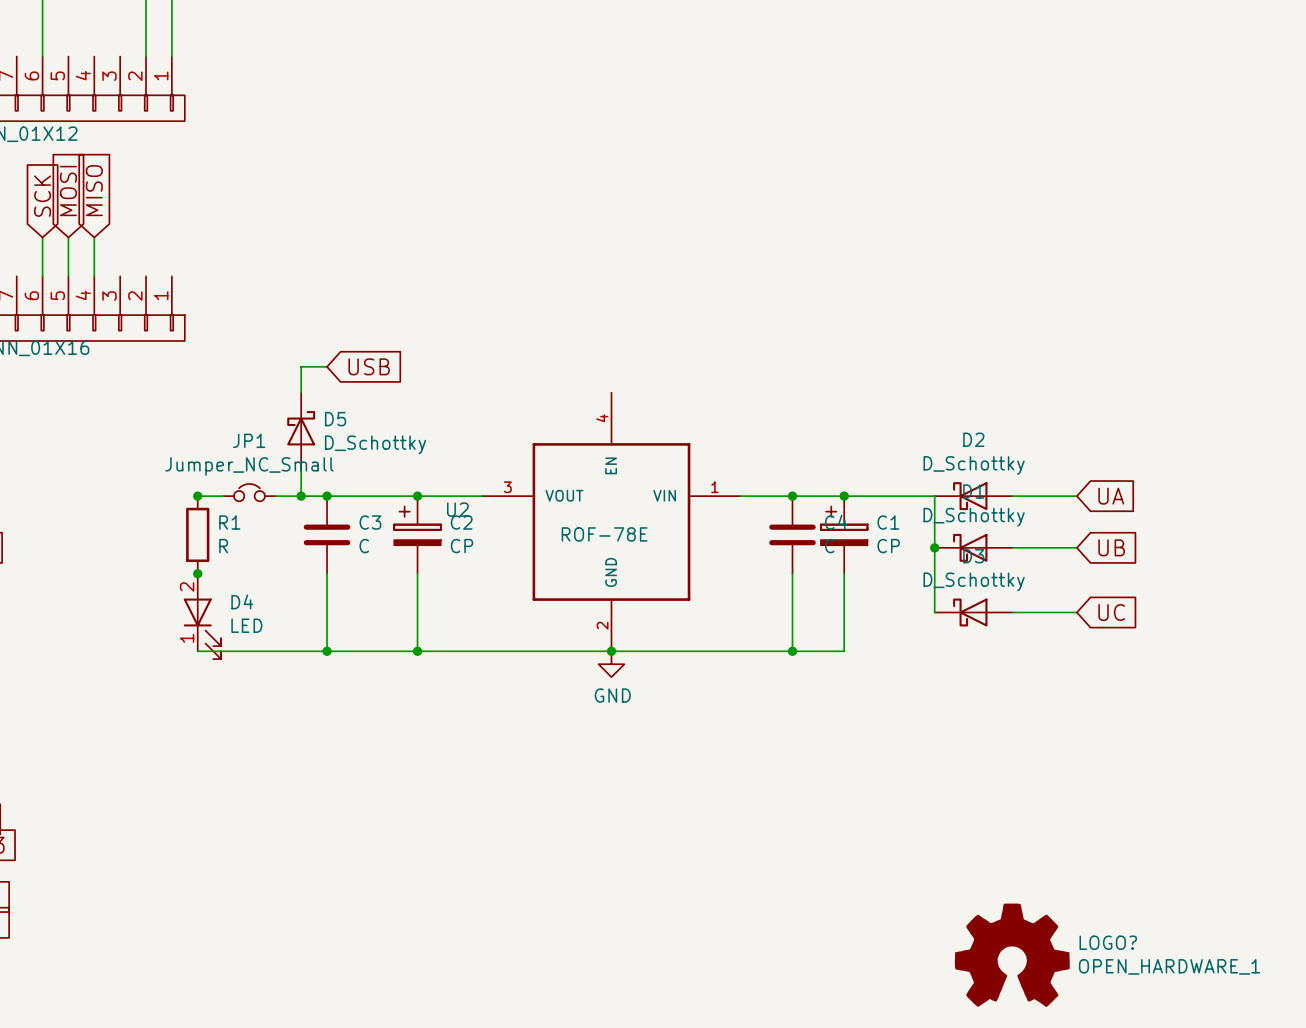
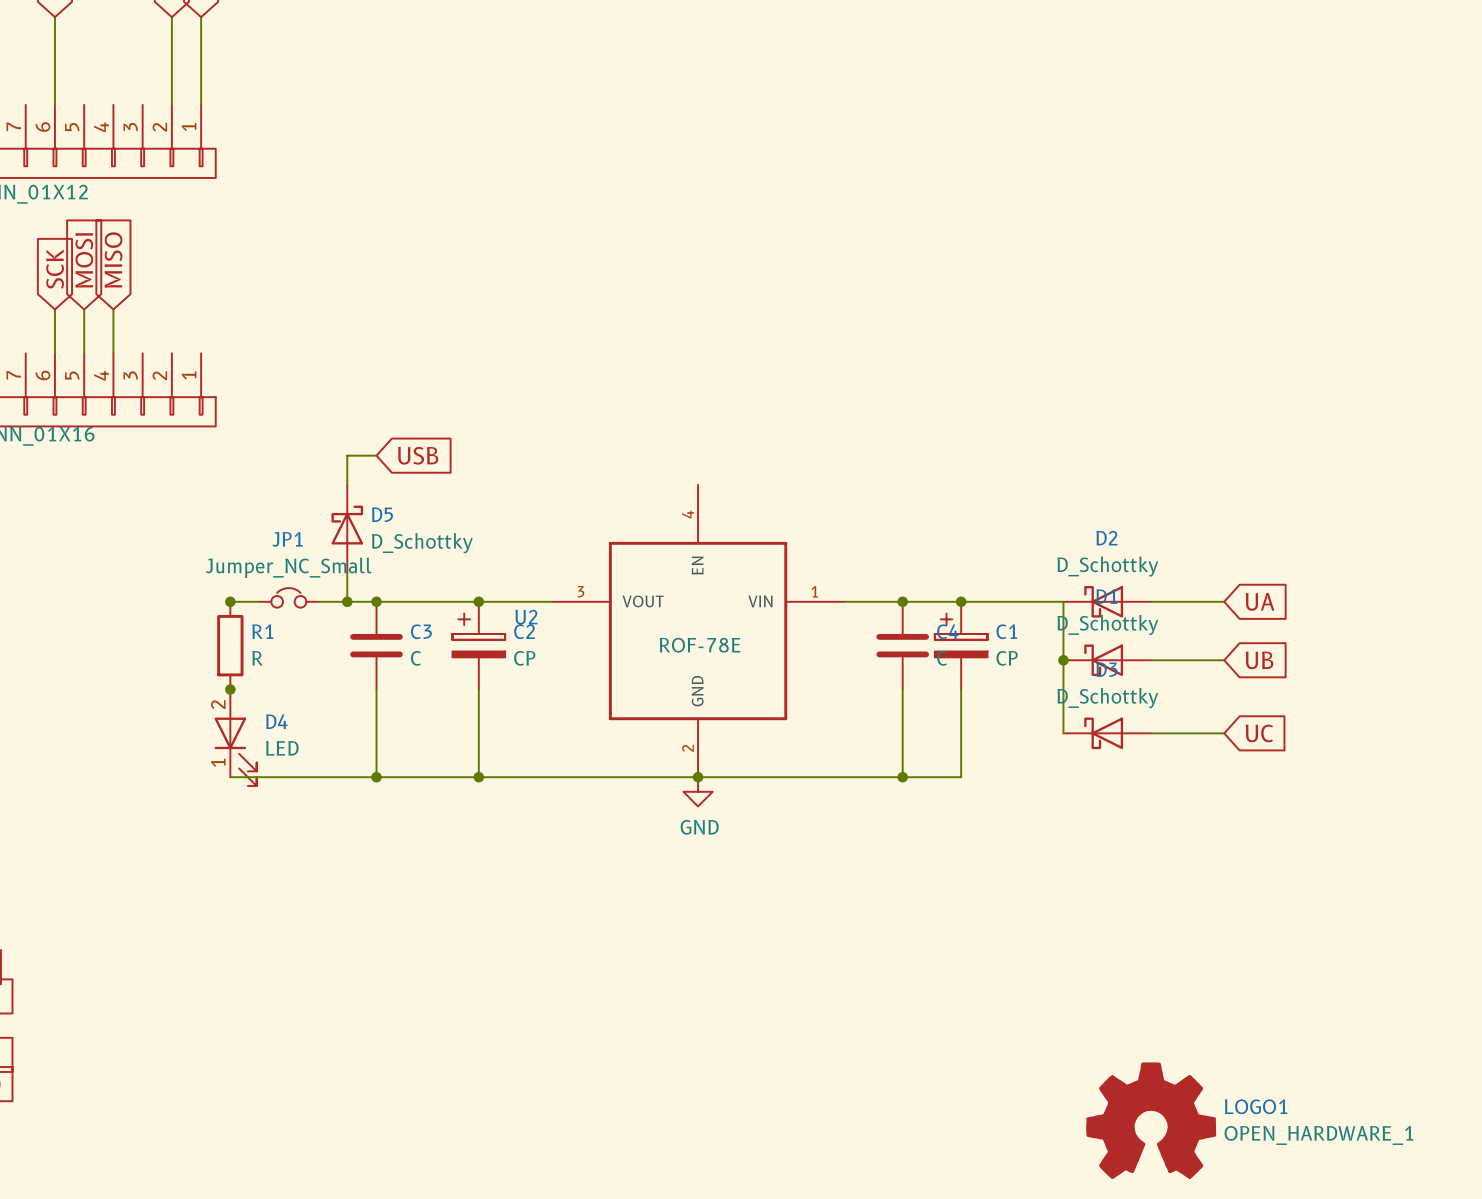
LOGO? name: LOGO? (1108, 942) -> LOGO1 (1256, 1106)

